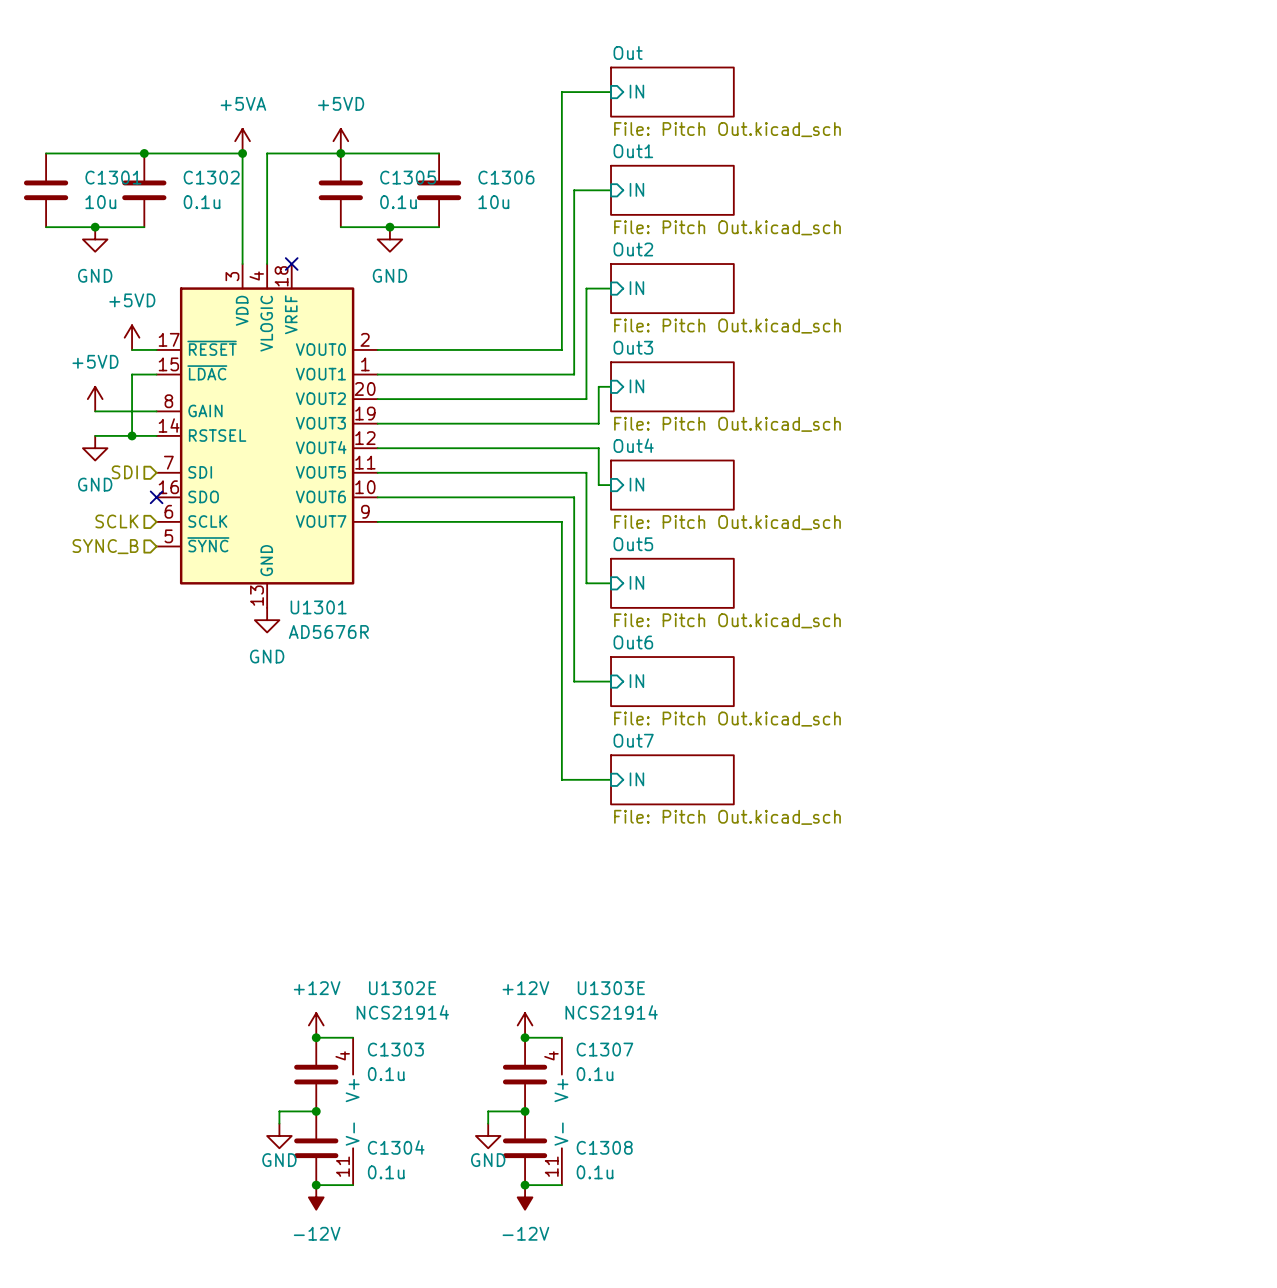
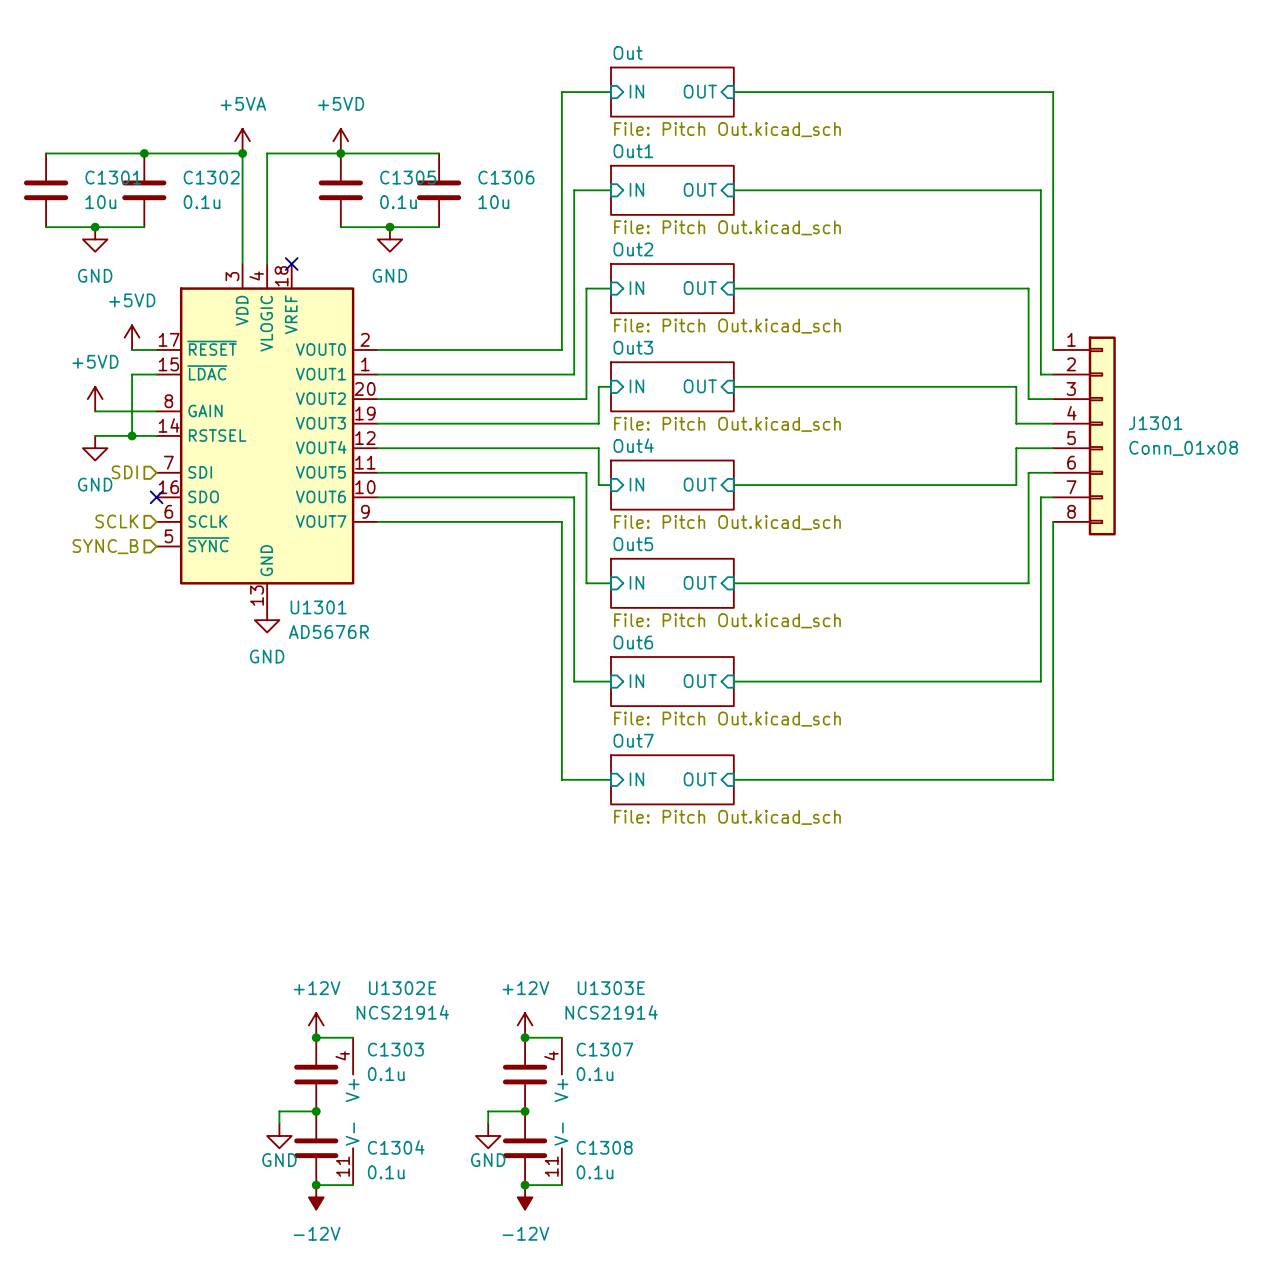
sheet pin: none -> OUT (700, 91)
wire: none -> (733, 92) (1053, 92) (1053, 349)
sheet pin: none -> OUT (700, 189)
wire: none -> (733, 190) (1040, 190) (1040, 374) (1053, 374)
sheet pin: none -> OUT (700, 288)
wire: none -> (733, 288) (1028, 288) (1028, 399) (1053, 399)
sheet pin: none -> OUT (700, 386)
wire: none -> (733, 386) (1016, 386) (1016, 423) (1053, 423)
J1301: none -> Conn_01x08 (1084, 435)
wire: none -> (1053, 448) (1016, 448) (1016, 485) (733, 485)
wire: none -> (1053, 472) (1028, 472) (1028, 583) (733, 583)
sheet pin: none -> OUT (700, 484)
wire: none -> (1053, 497) (1040, 497) (1040, 681) (733, 681)
wire: none -> (1053, 521) (1053, 779) (733, 779)
sheet pin: none -> OUT (700, 582)
sheet pin: none -> OUT (700, 681)
sheet pin: none -> OUT (700, 779)

